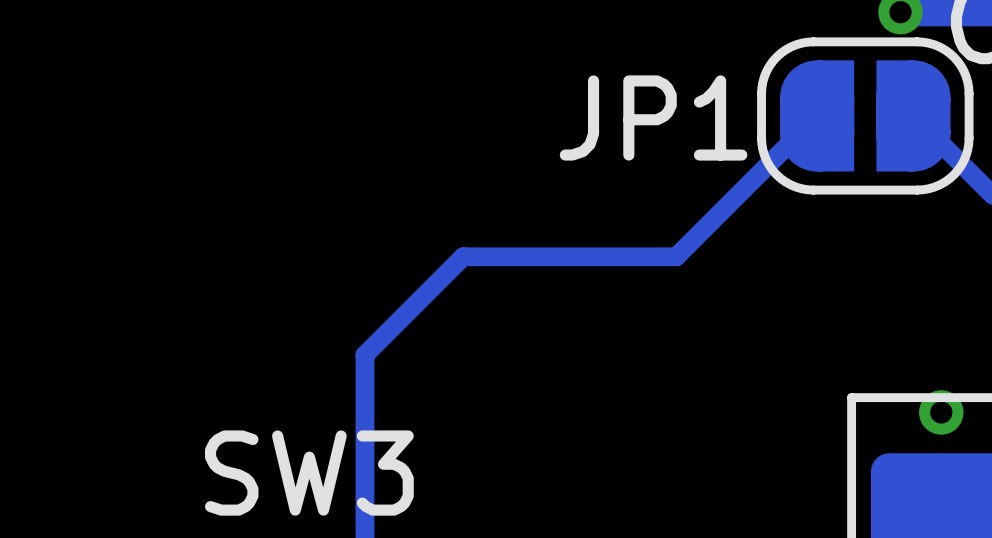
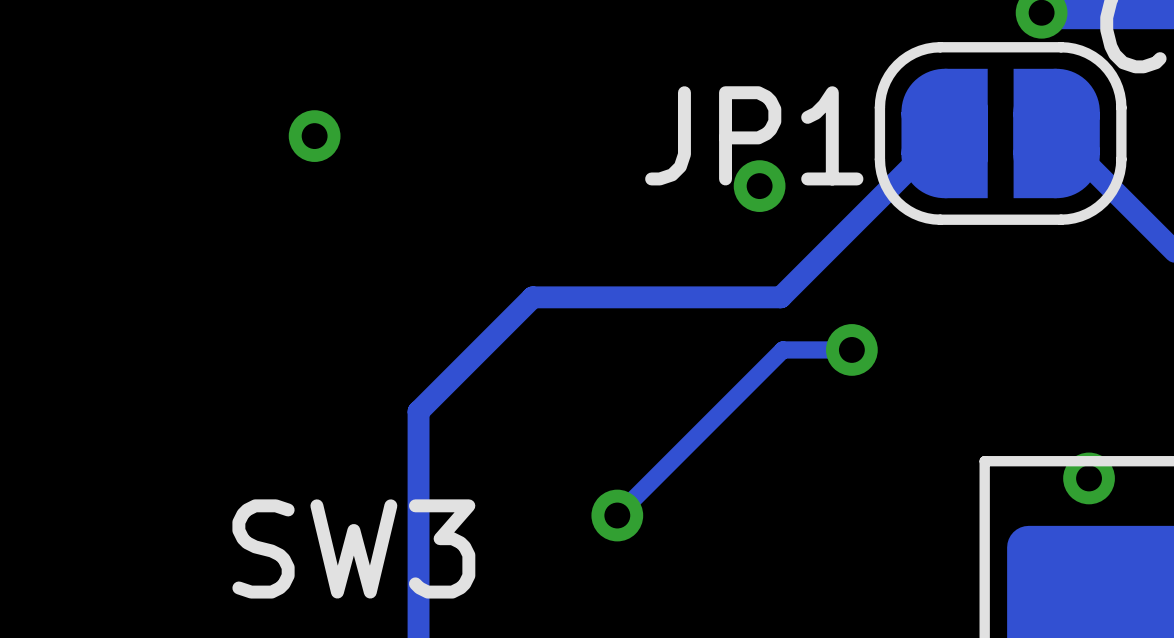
via: none -> (314, 136)
via: none -> (759, 186)
track: none -> (851, 349) (782, 349) (617, 515)
via: none -> (851, 349)
via: none -> (617, 515)

